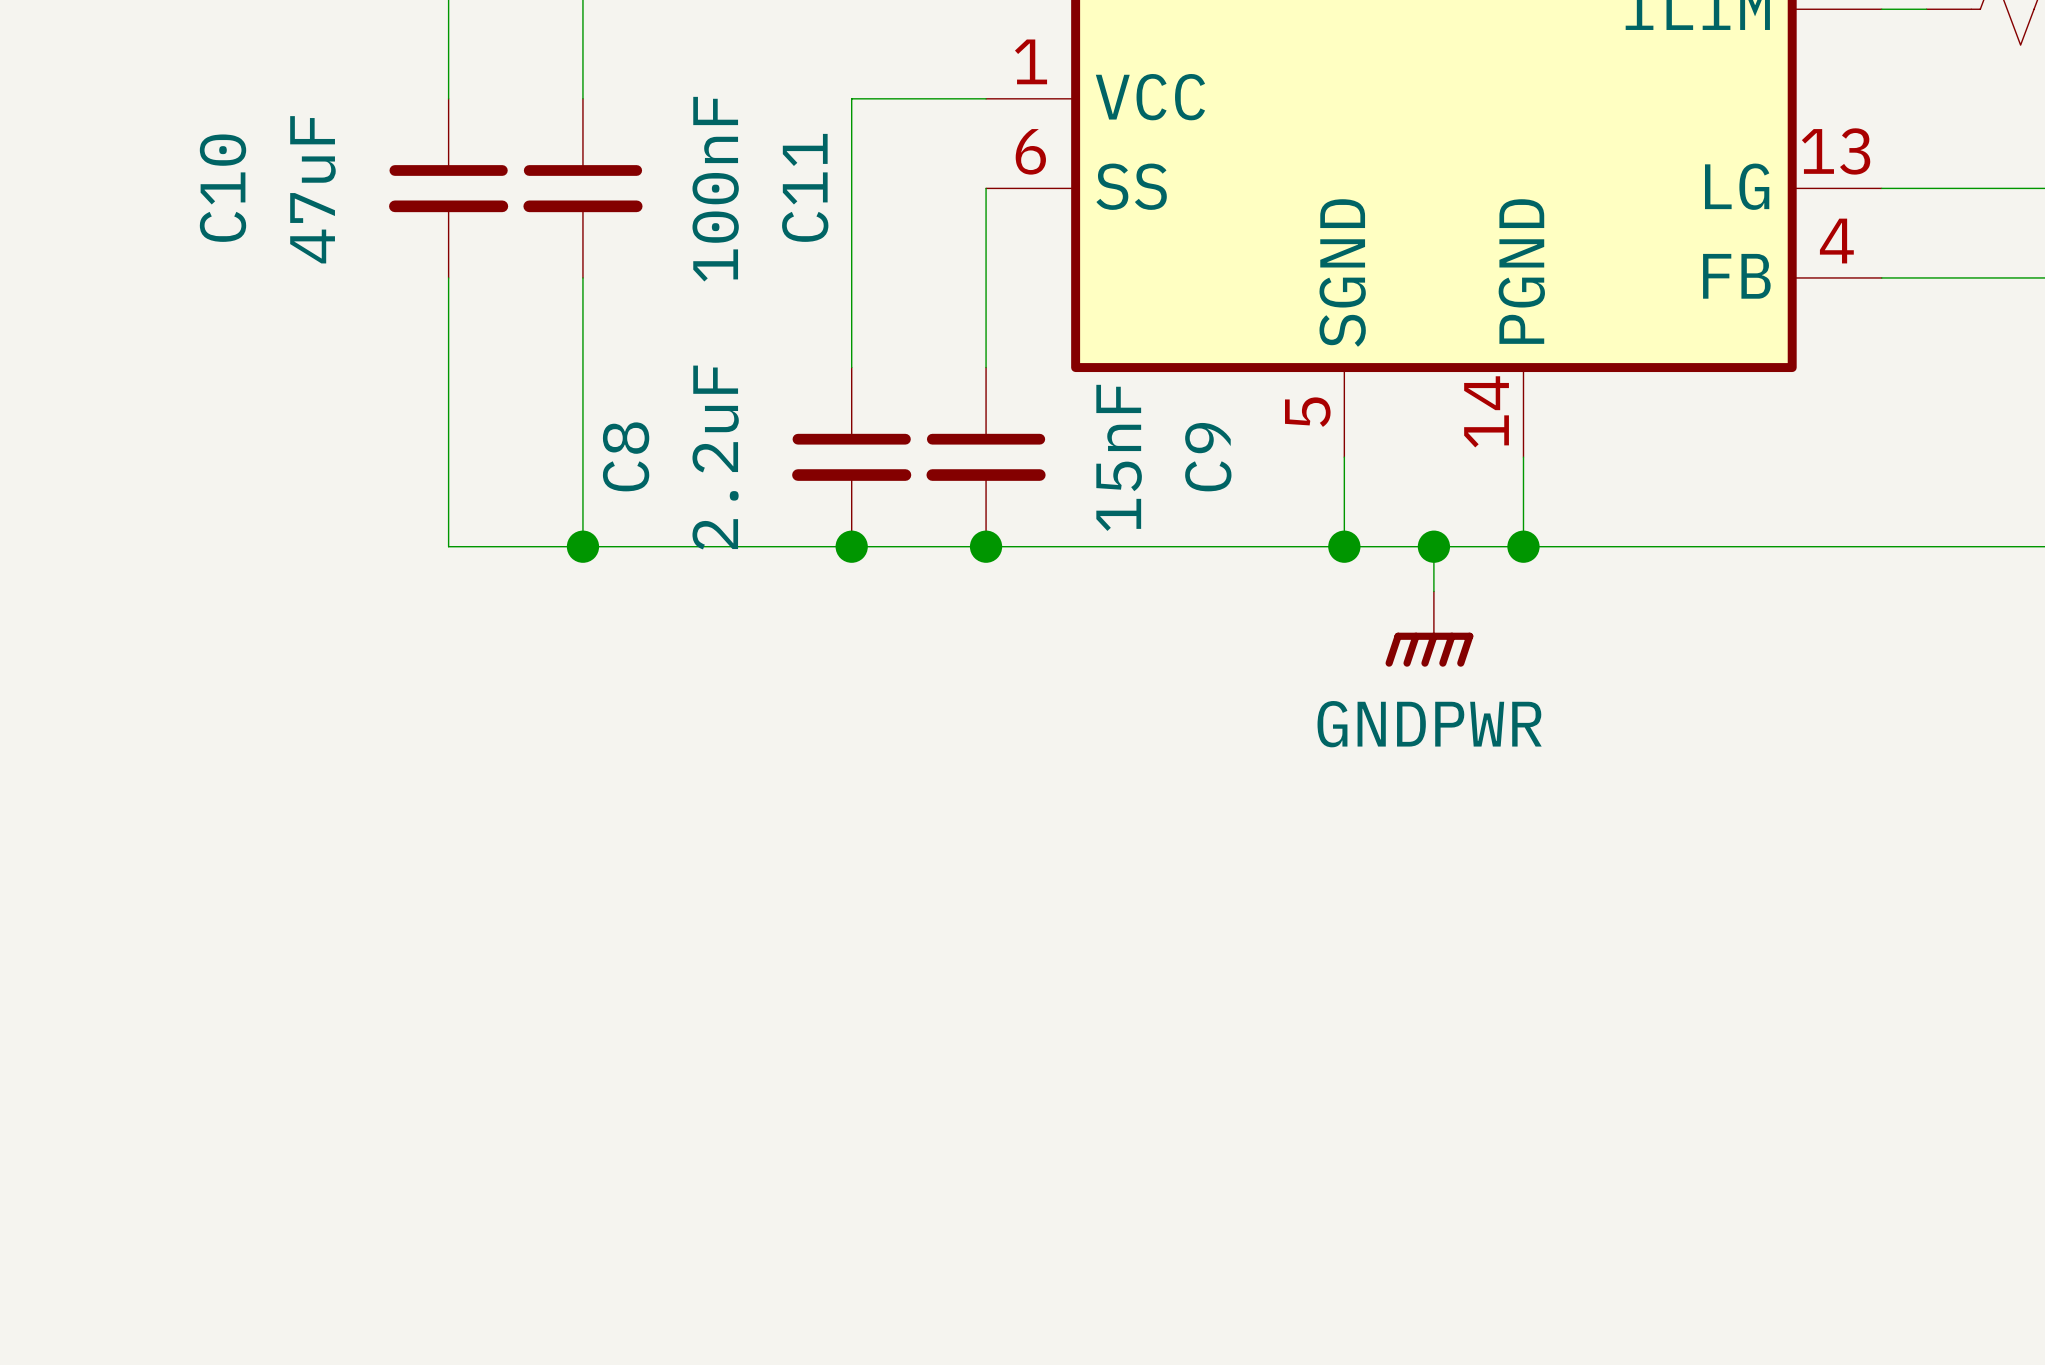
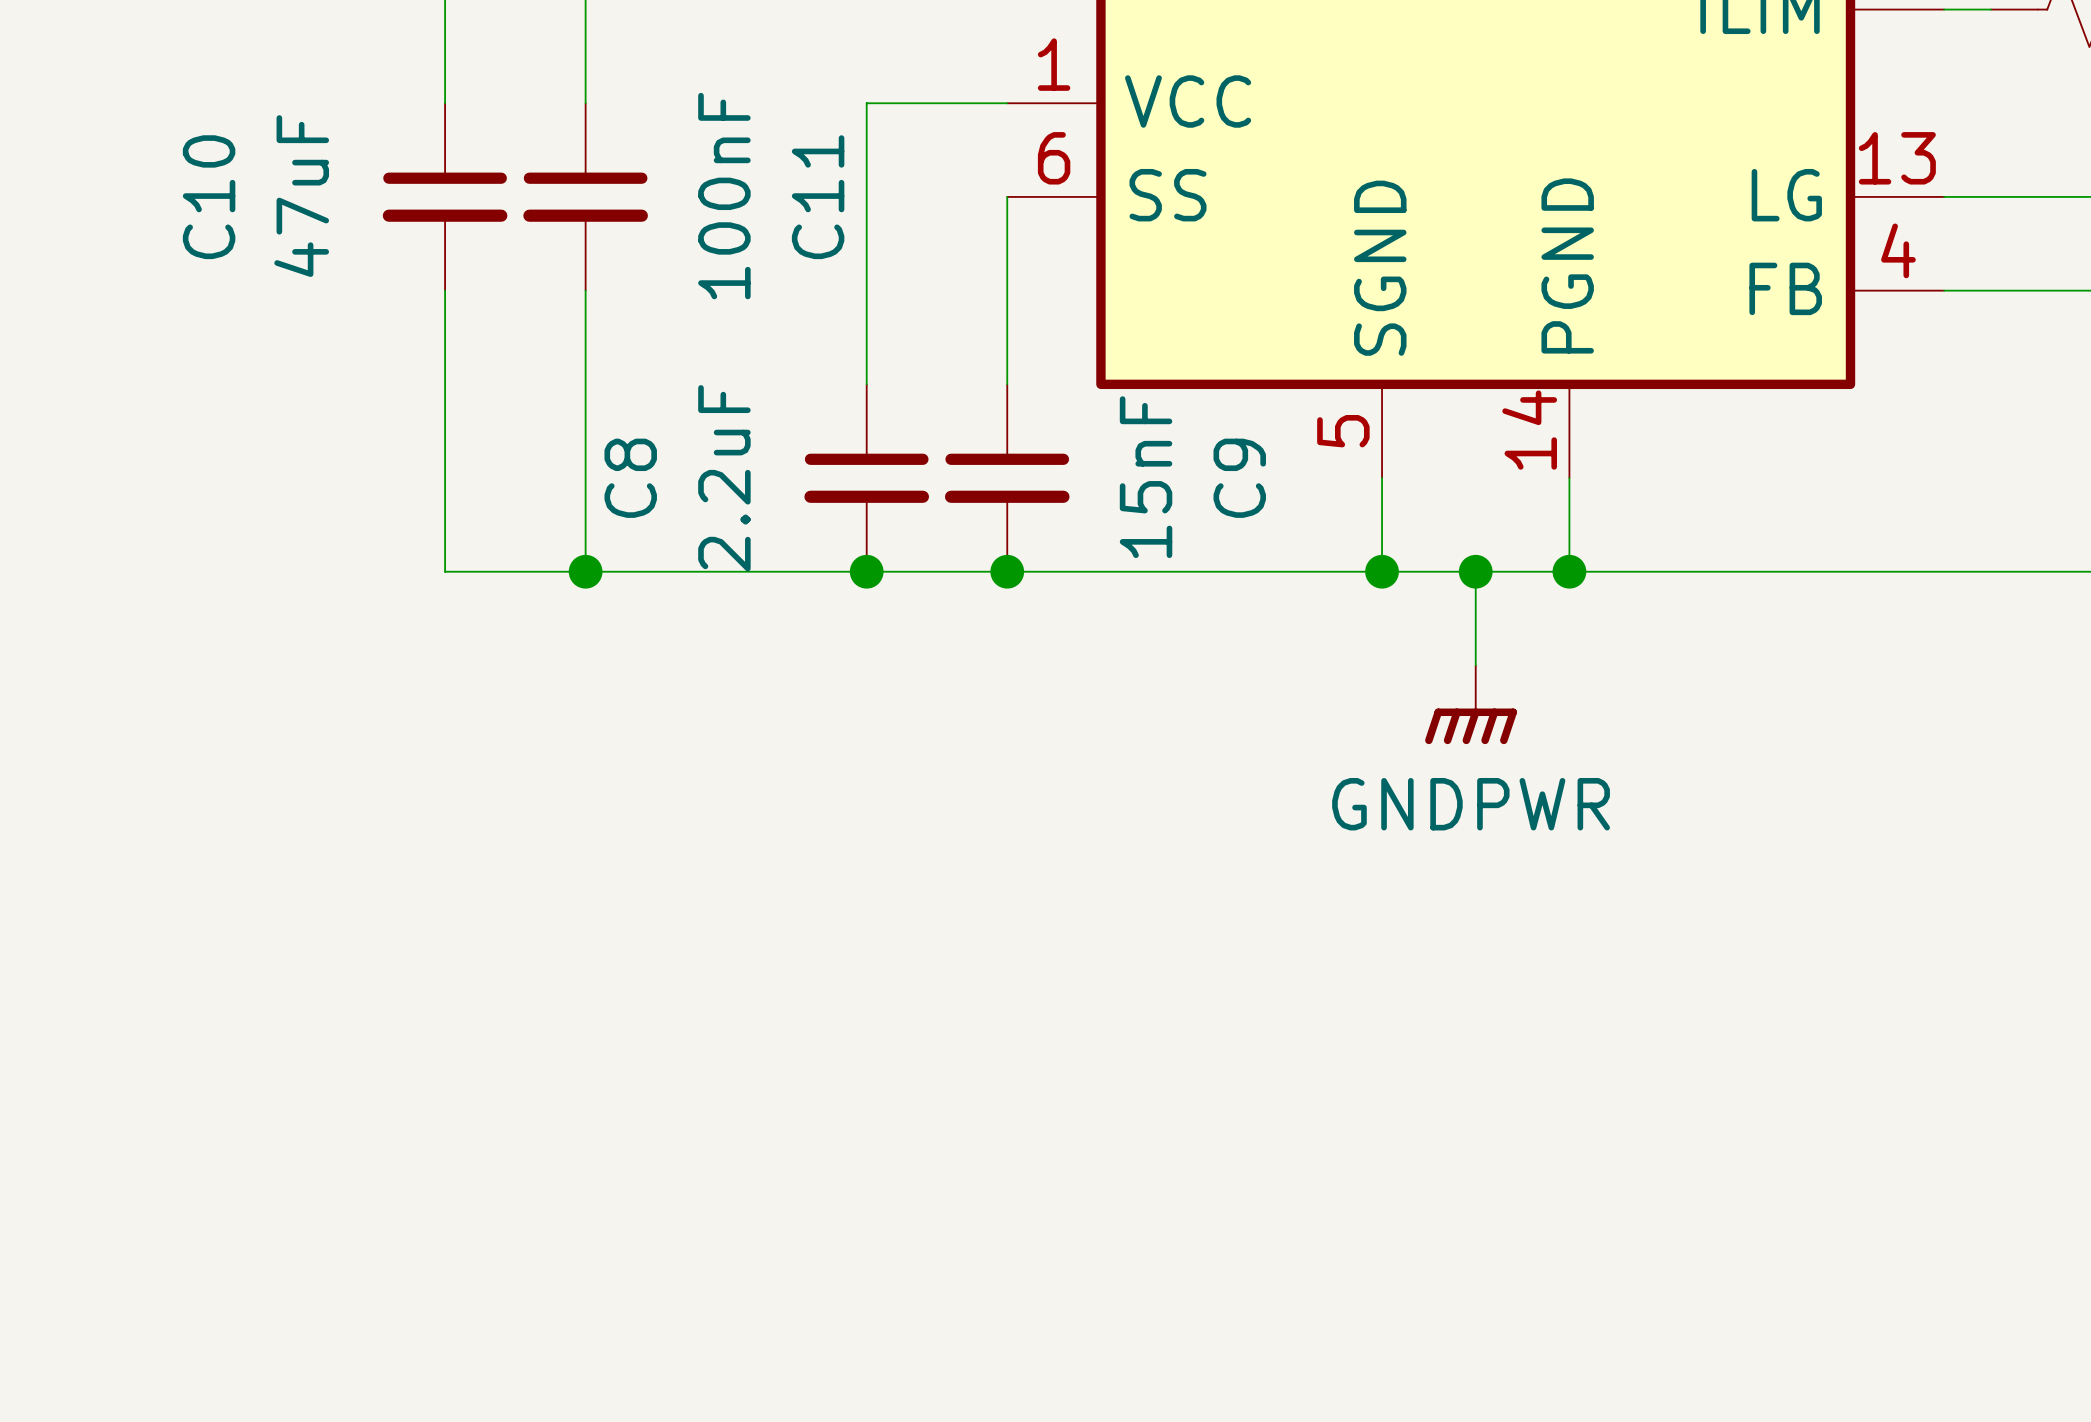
power symbol position: GNDPWR (1429, 629) -> GNDPWR (1471, 704)

